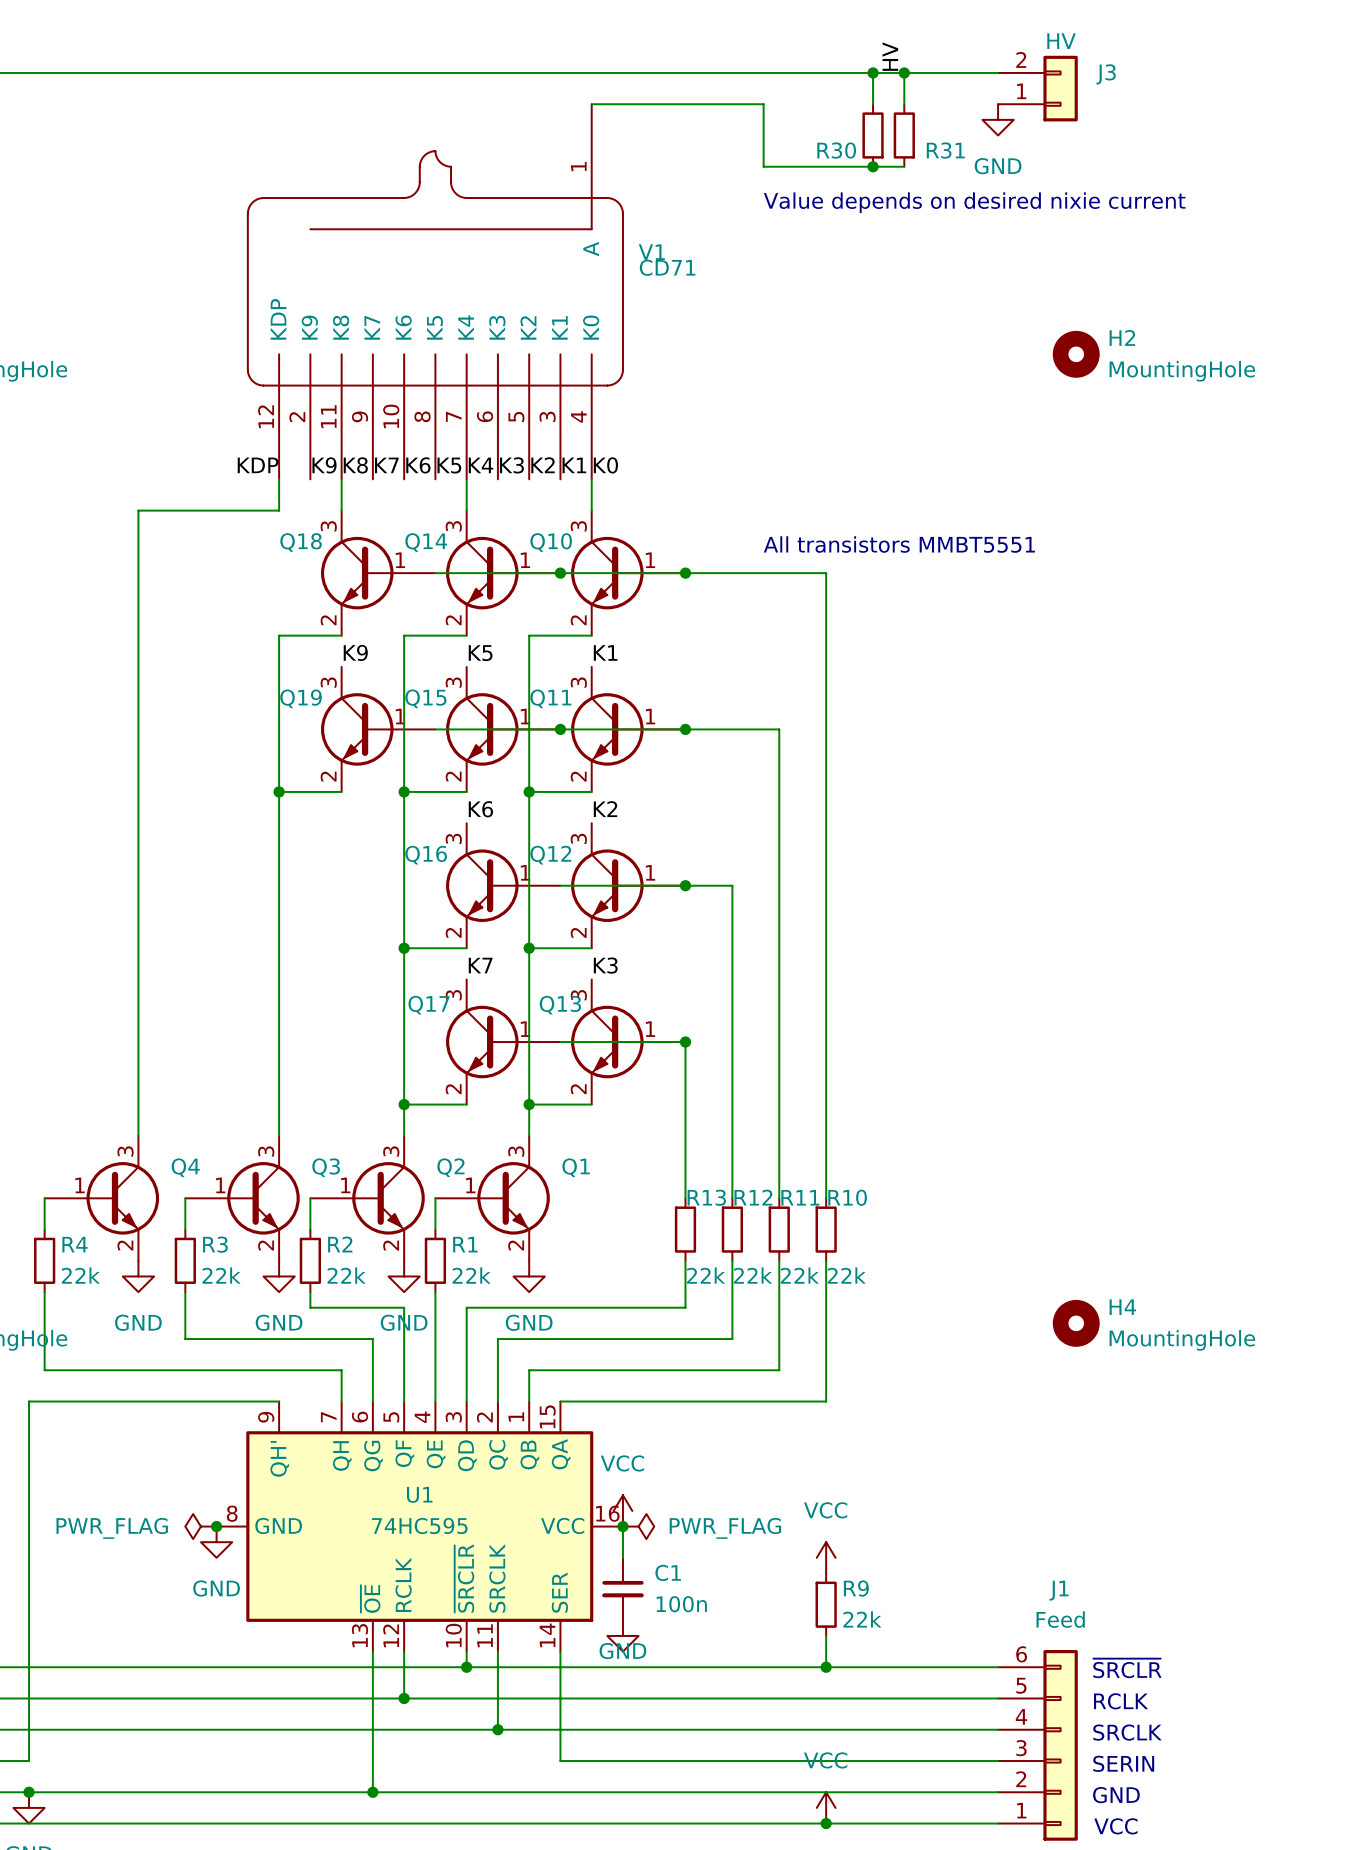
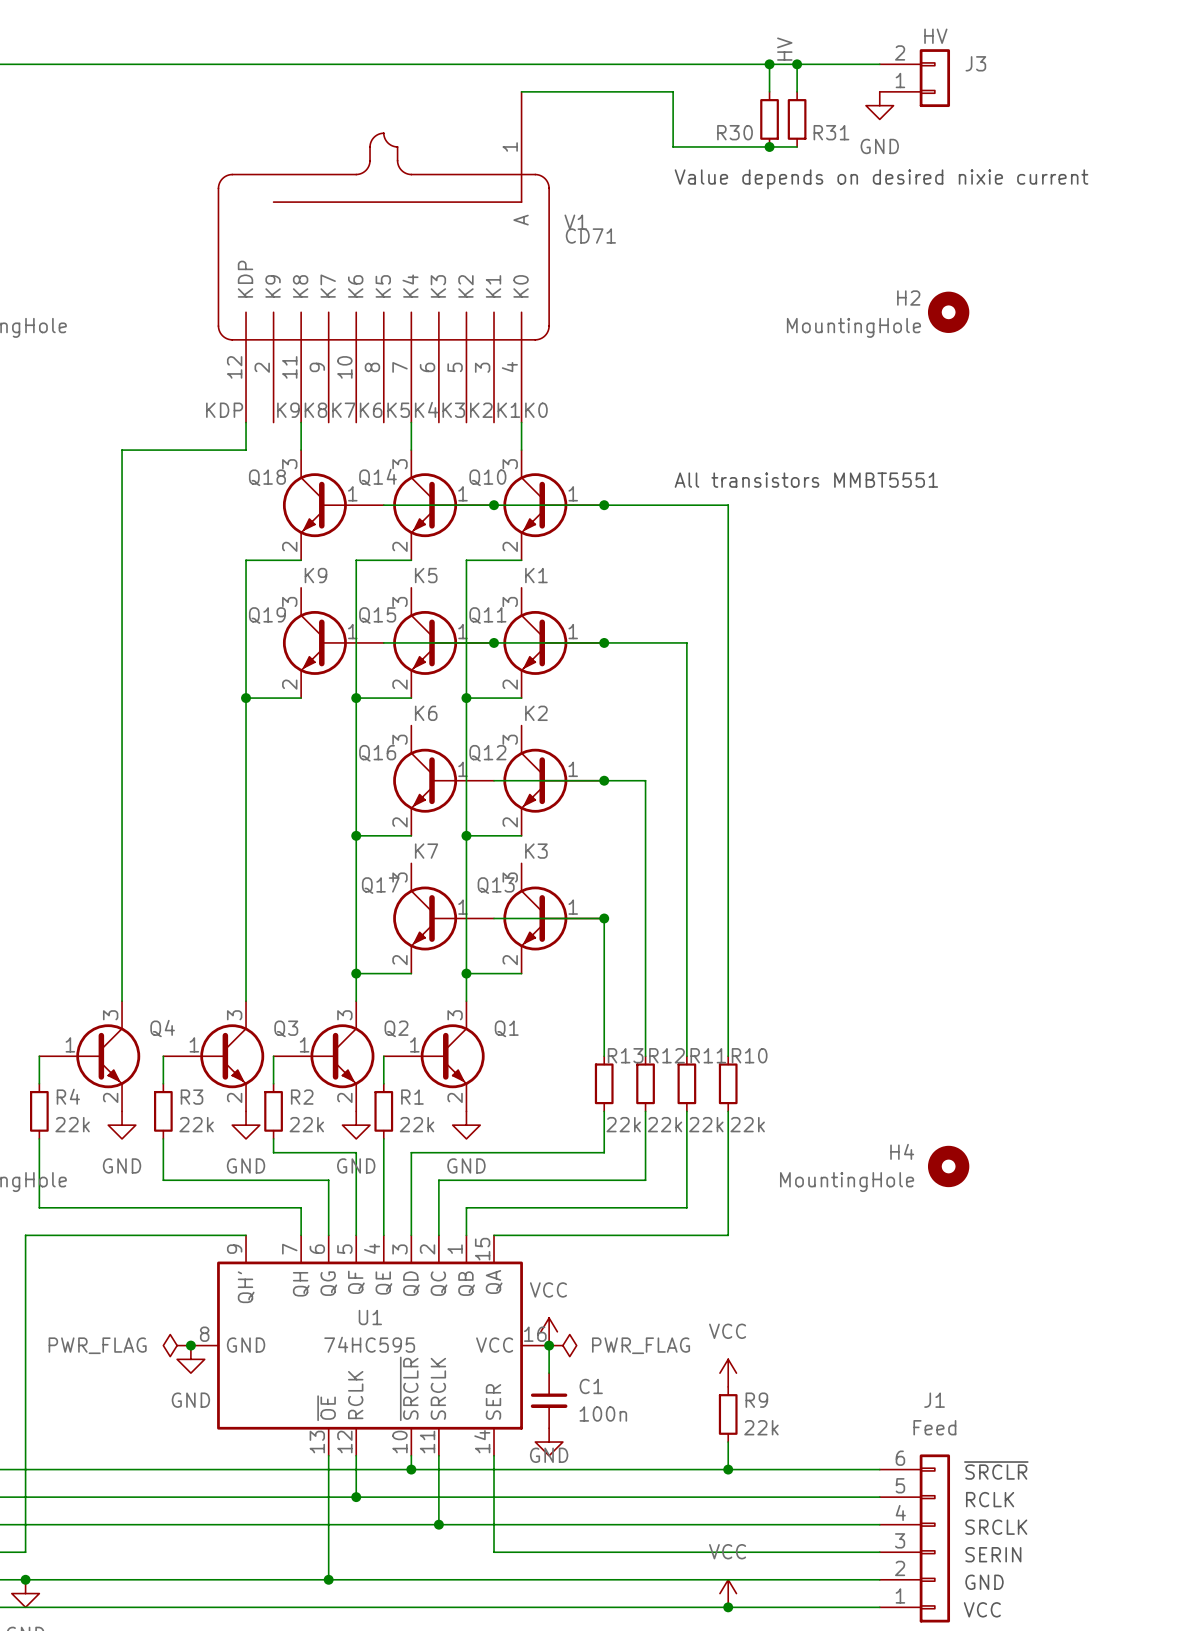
H2 name position: H2 (1122, 337) -> H2 (908, 298)
H2 value position: MountingHole (1182, 371) -> MountingHole (853, 327)
H4 name position: H4 (1122, 1307) -> H4 (902, 1151)
H4 value position: MountingHole (1182, 1340) -> MountingHole (847, 1182)

